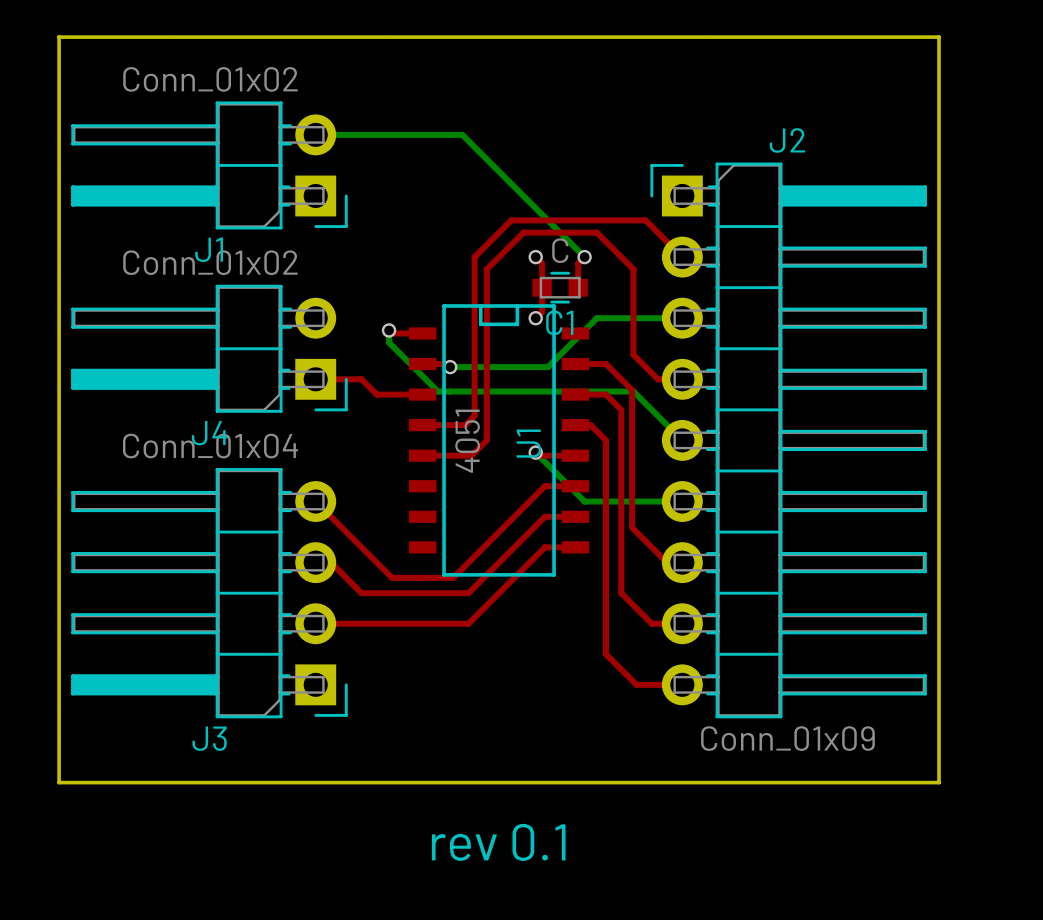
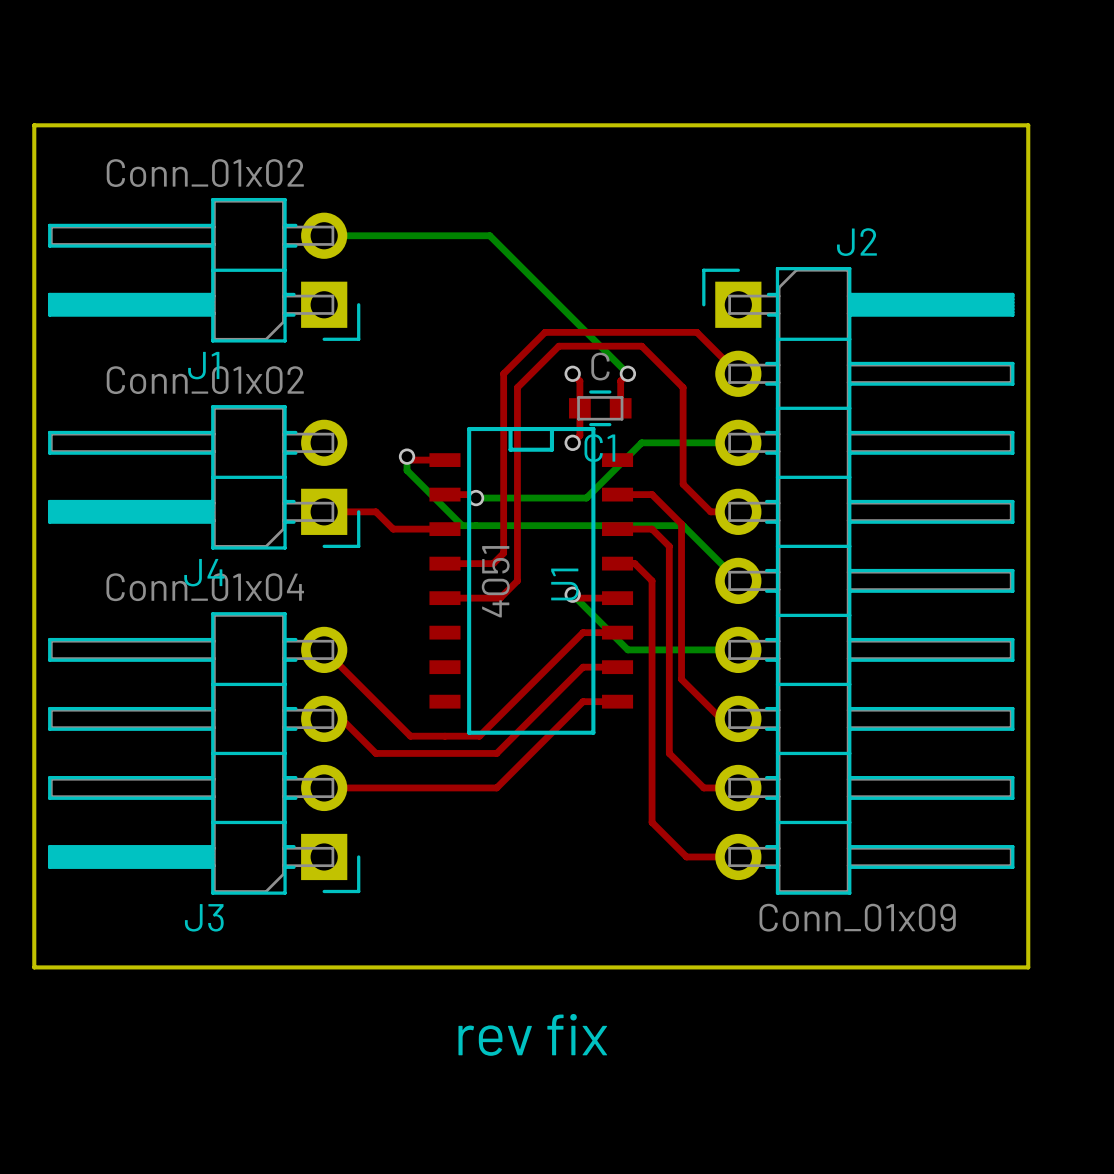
text: rev 0.1 (498, 842) -> rev fix (532, 1034)

